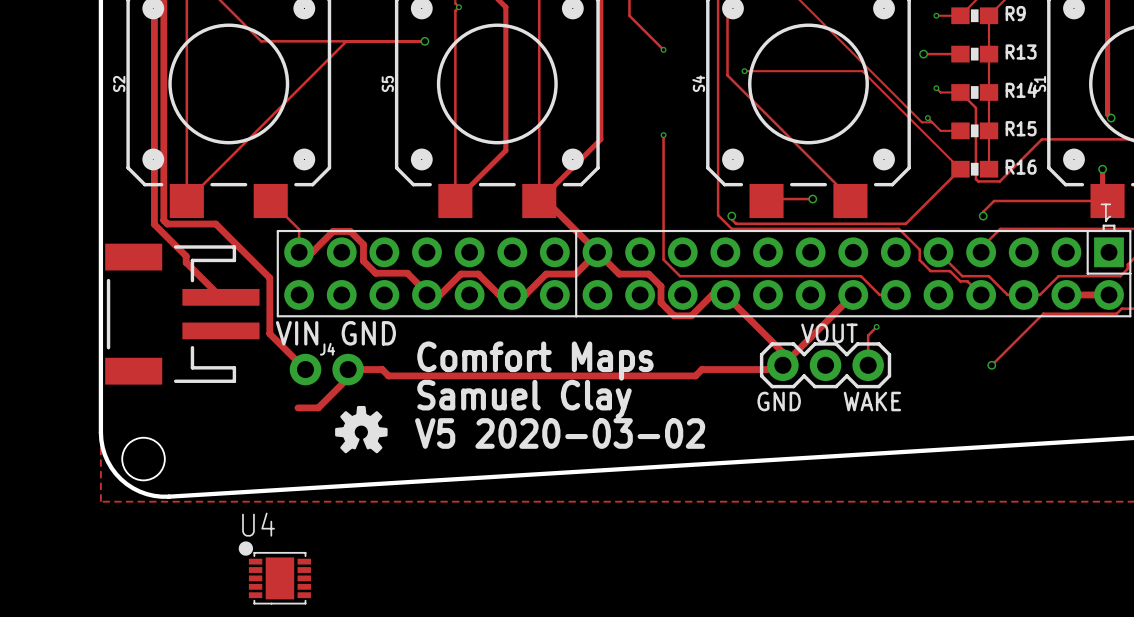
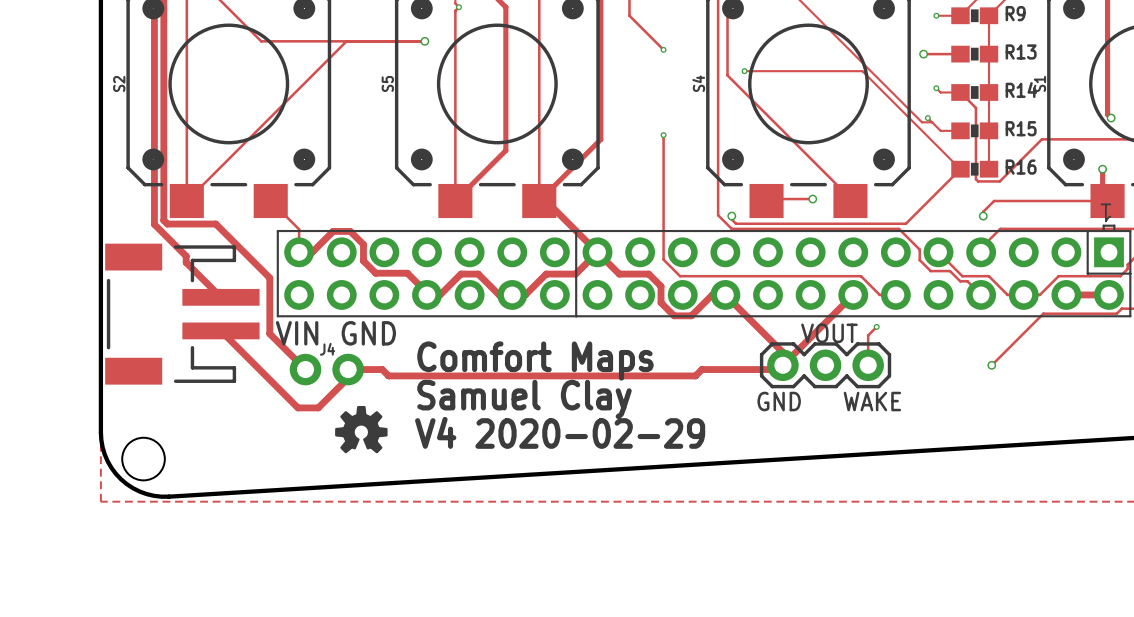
track: none -> (220, 330) (297, 407)
text: V5 2020-03-02 (560, 433) -> V4 2020-02-29 (560, 432)
U4: (274, 572) -> none

